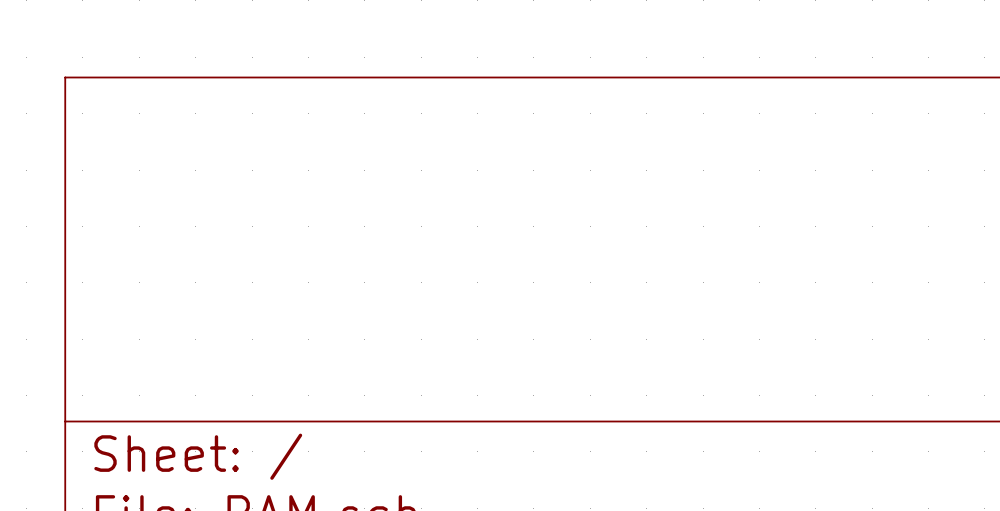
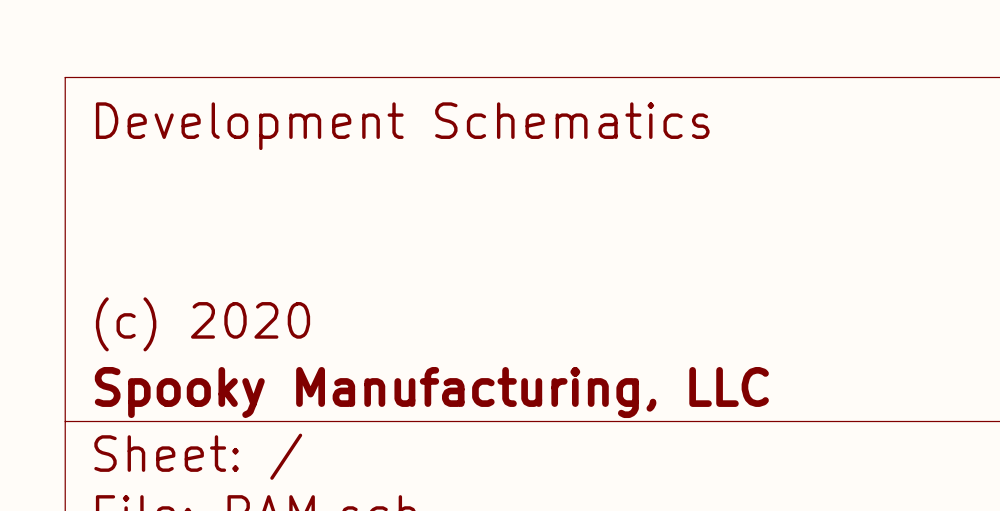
title block: none -> Development Schematics (402, 126)
title block: none -> (c) 2020 (203, 324)
title block: none -> Spooky Manufacturing, LLC (431, 392)

